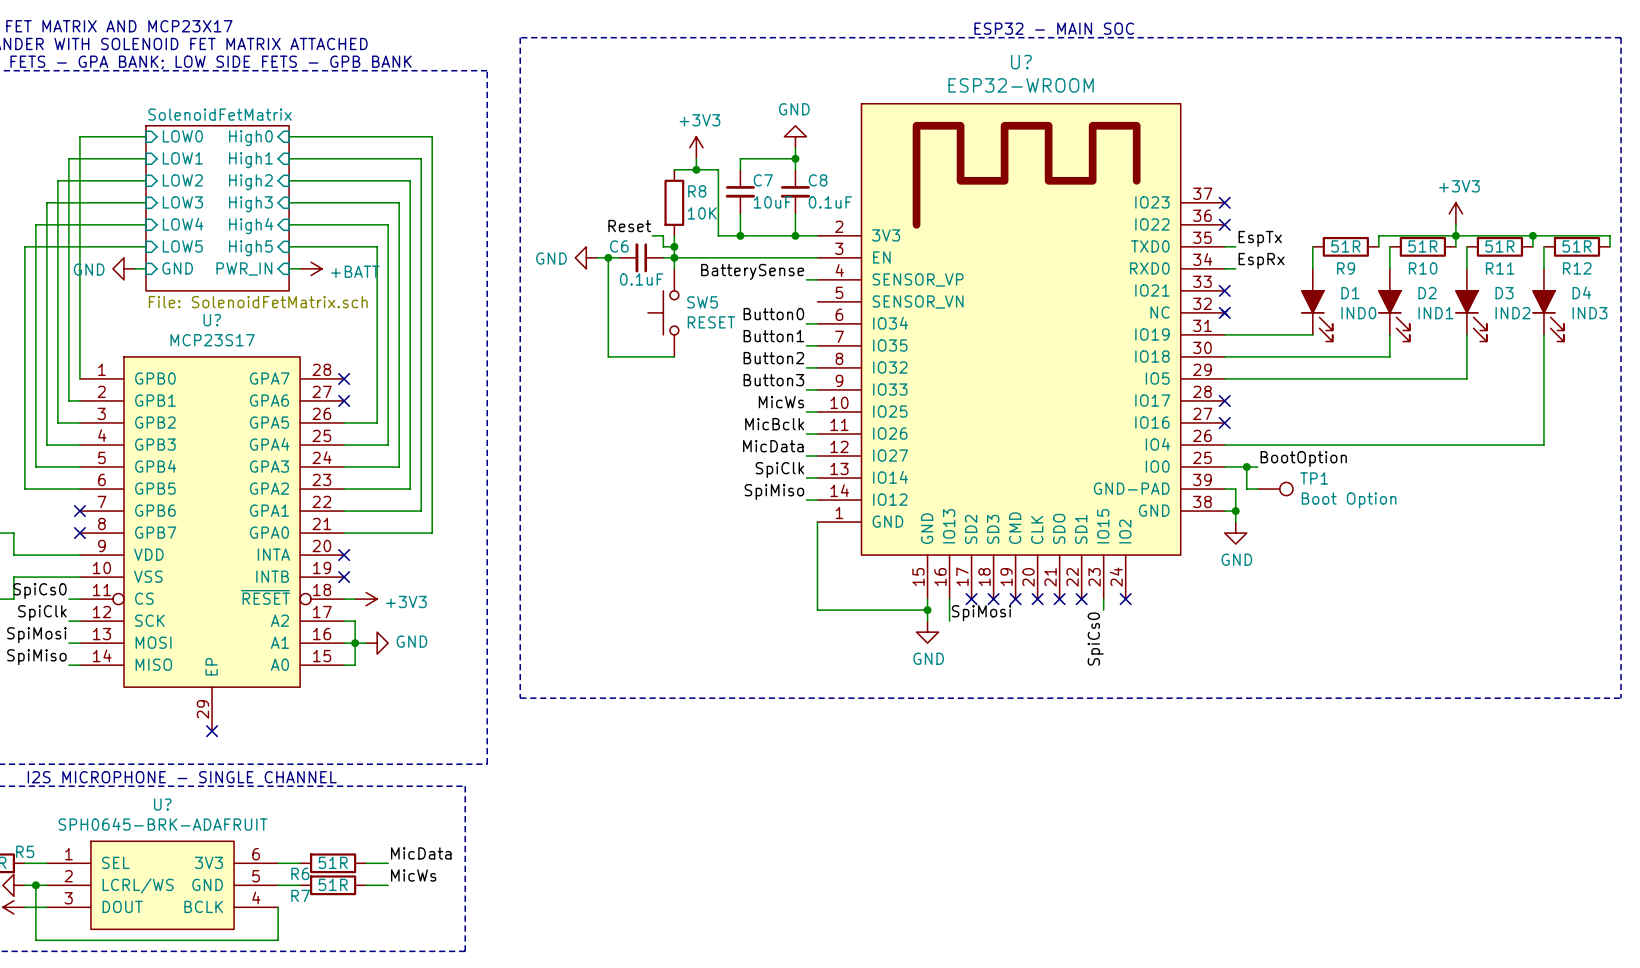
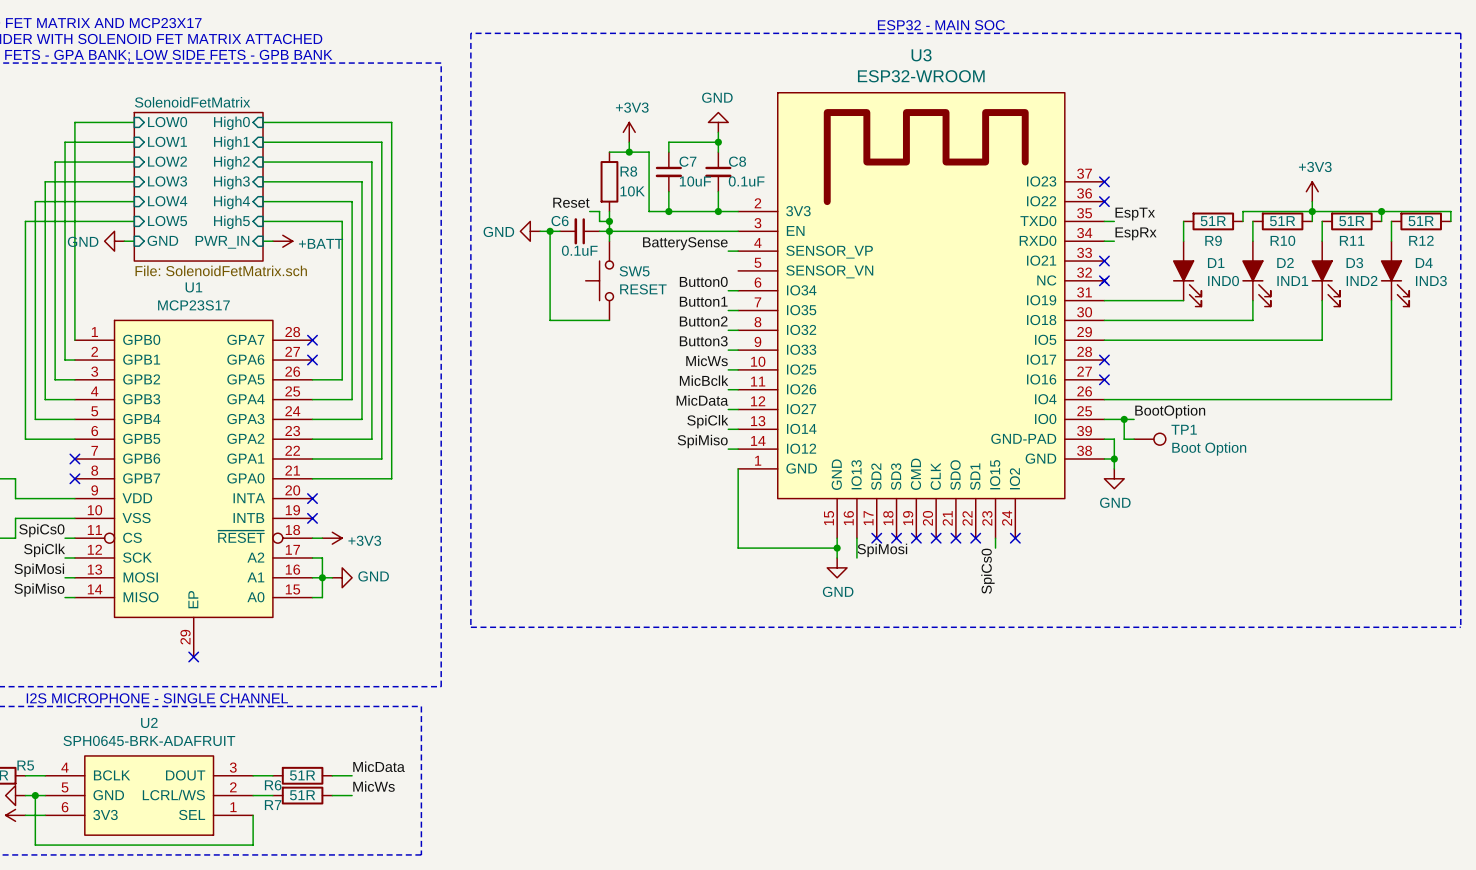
U? name: U? (1021, 62) -> U3 (921, 55)
U? name: U? (212, 320) -> U1 (193, 287)
U? name: U? (162, 804) -> U2 (149, 722)
U? rotation: 0° (162, 885) -> 180° (149, 795)

